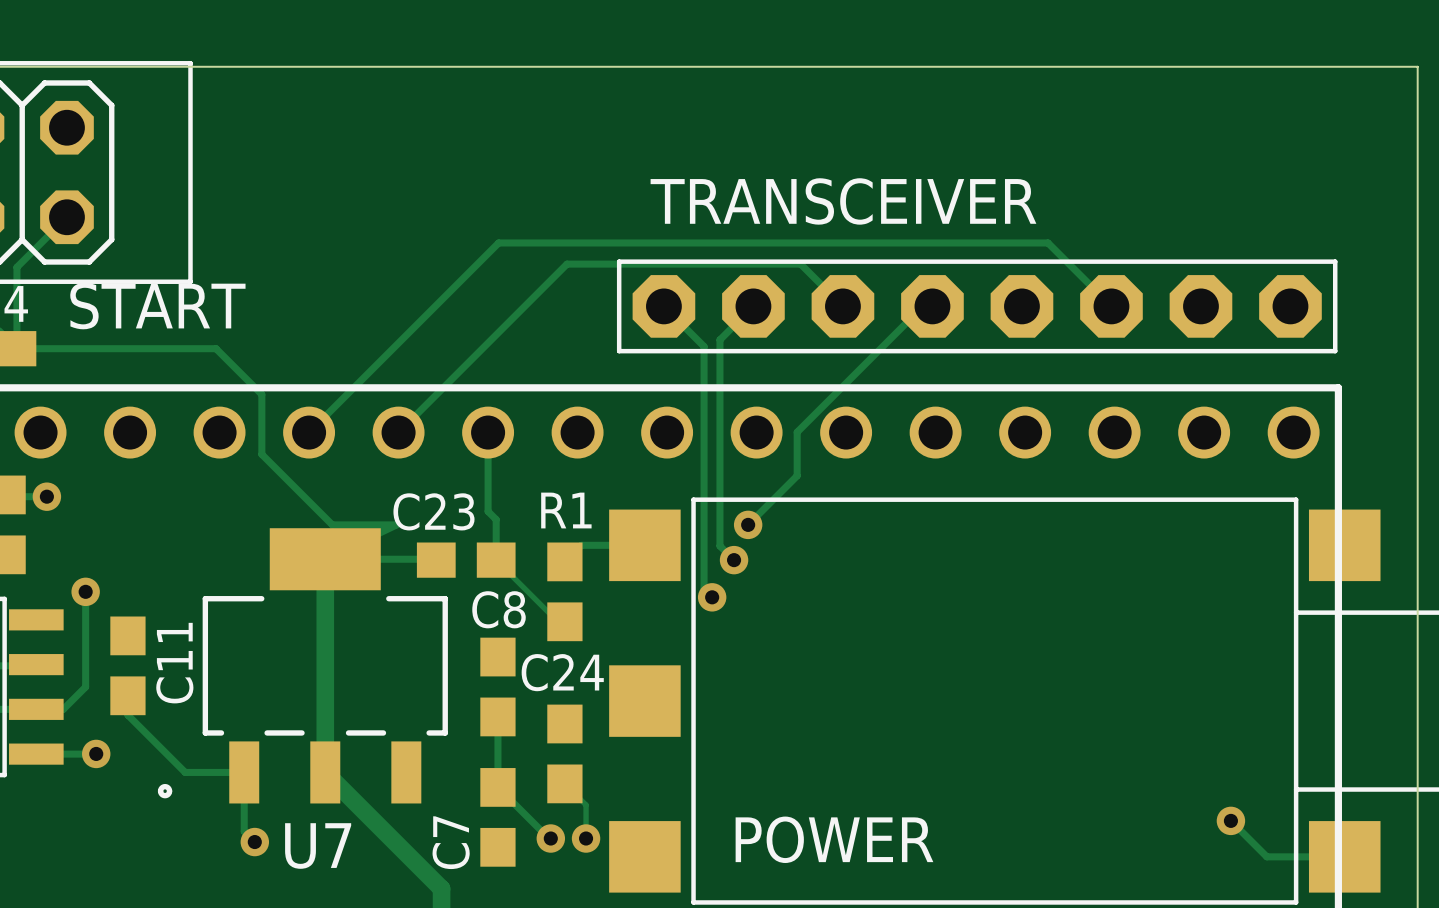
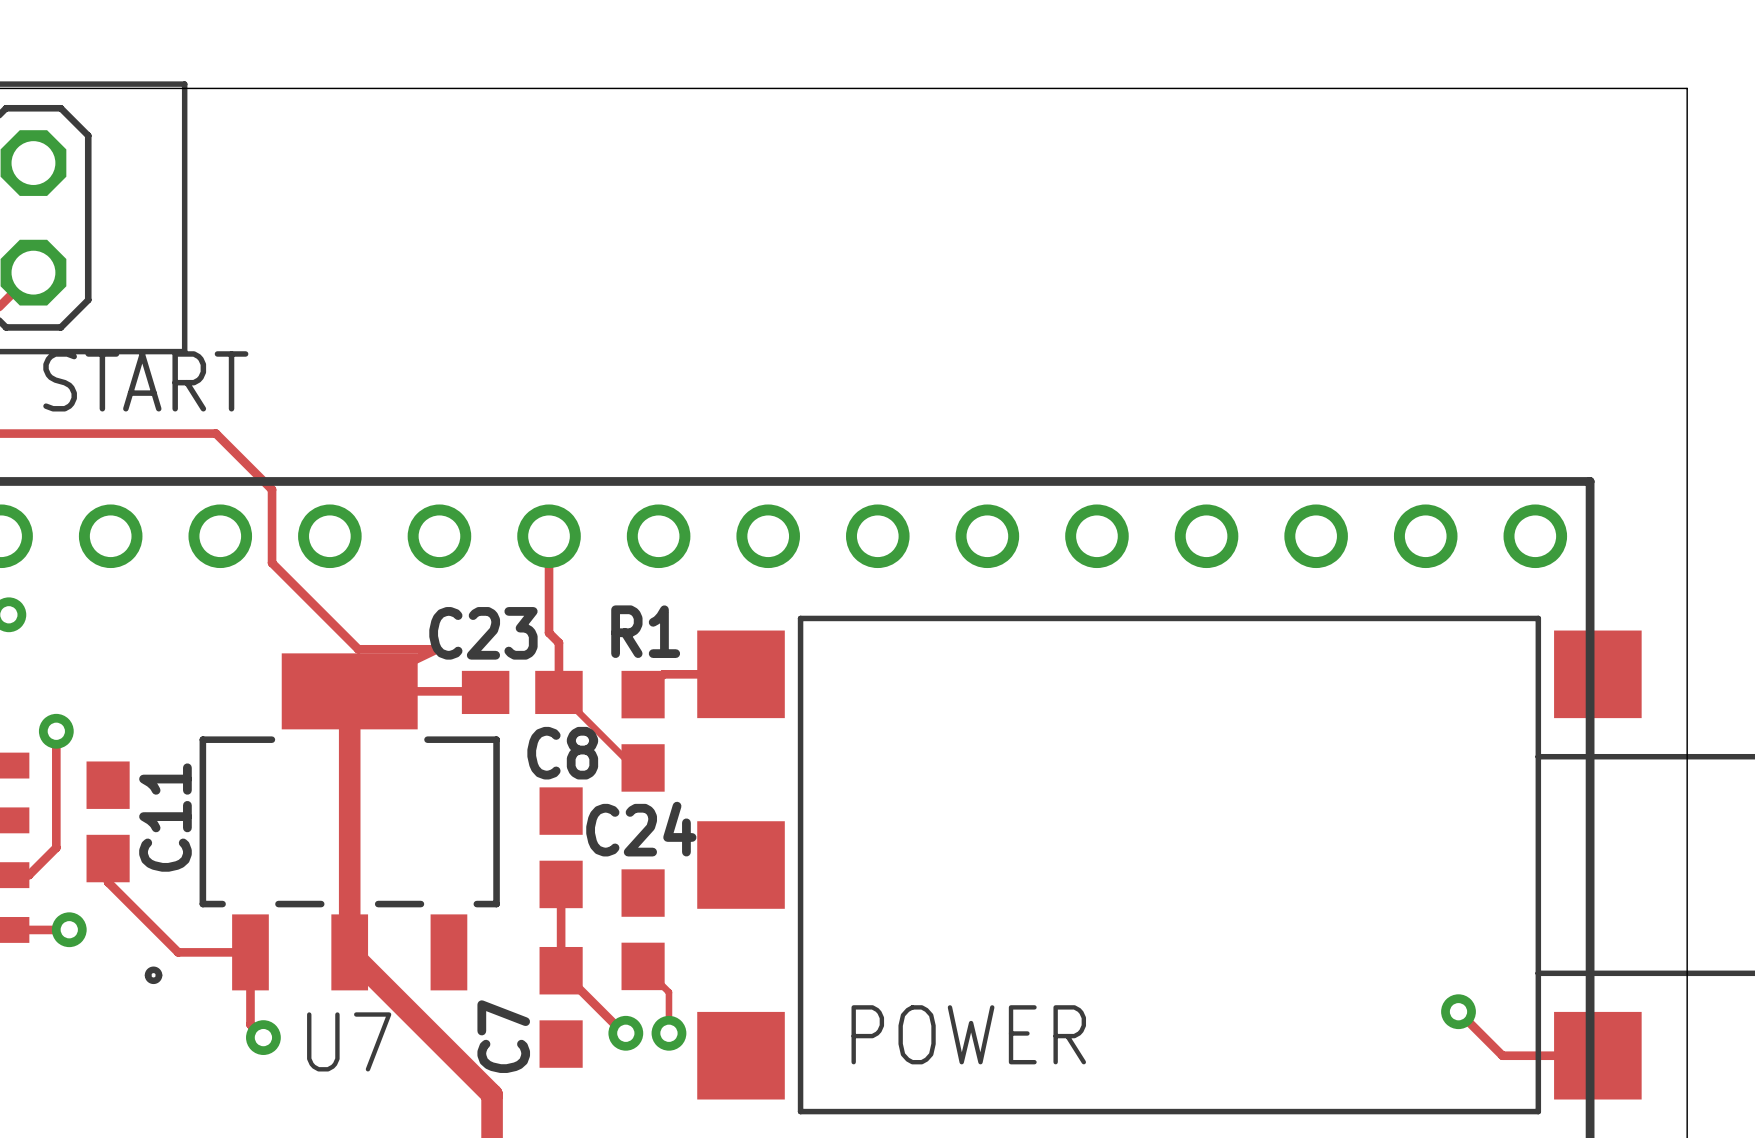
track: (663, 306) (704, 346) (704, 589) (712, 597) -> none
track: (753, 306) (719, 339) (719, 546) (734, 560) -> none
track: (842, 306) (800, 264) (567, 264) (398, 432) -> none
track: (932, 306) (922, 306) (797, 432) (797, 475) (748, 524) -> none
TRANSCEIVER: (977, 306) -> none
track: (1111, 306) (1048, 242) (498, 242) (309, 432) -> none
via: (748, 524) -> none
via: (734, 560) -> none
via: (712, 597) -> none

